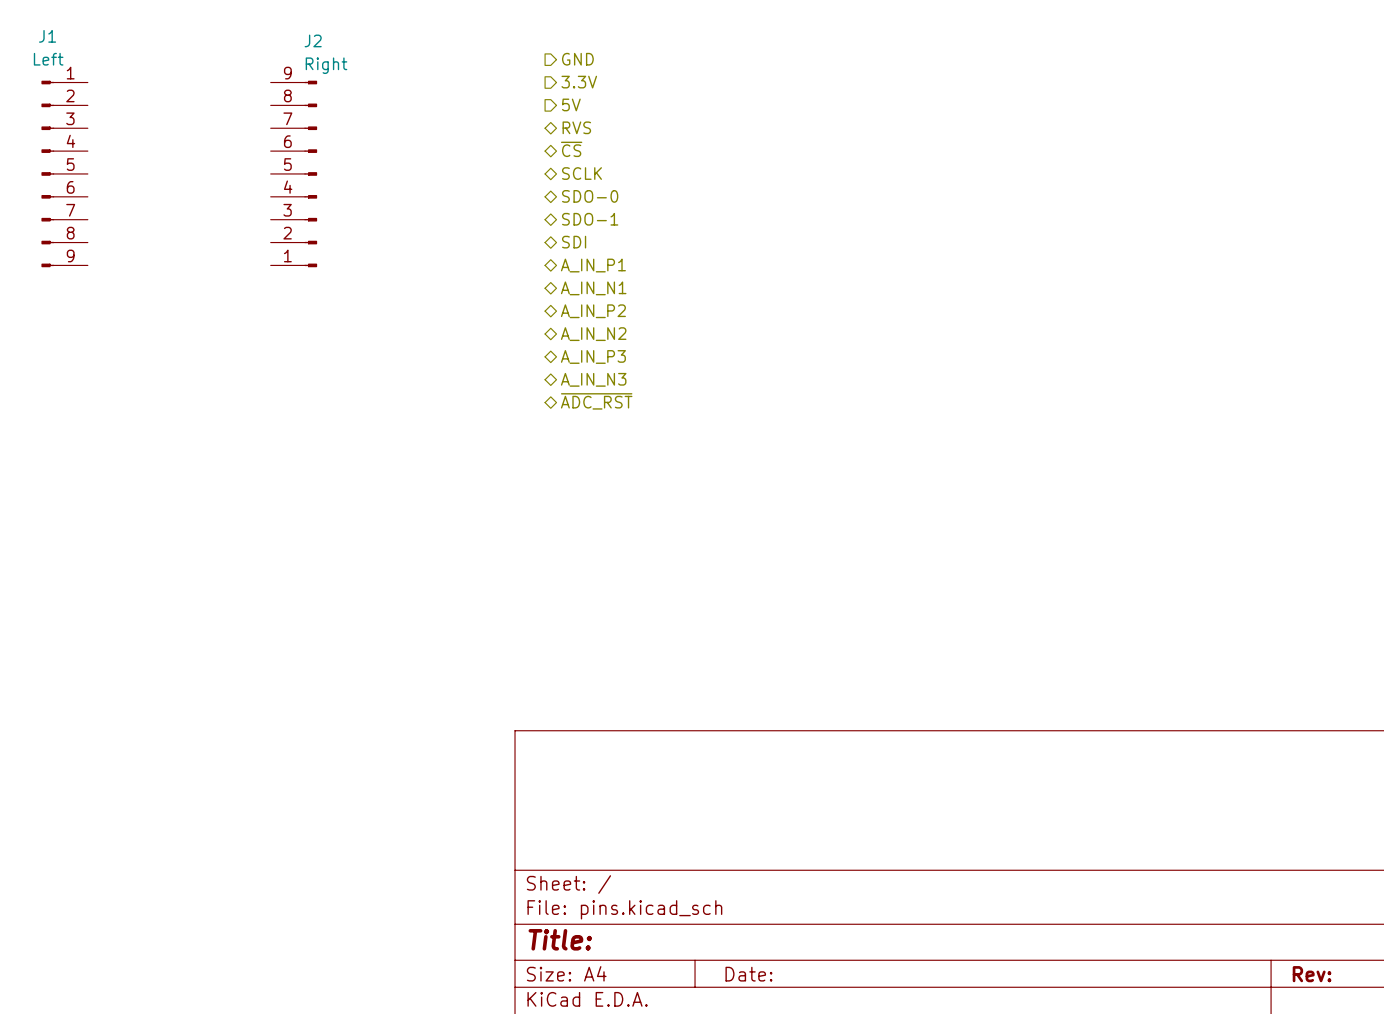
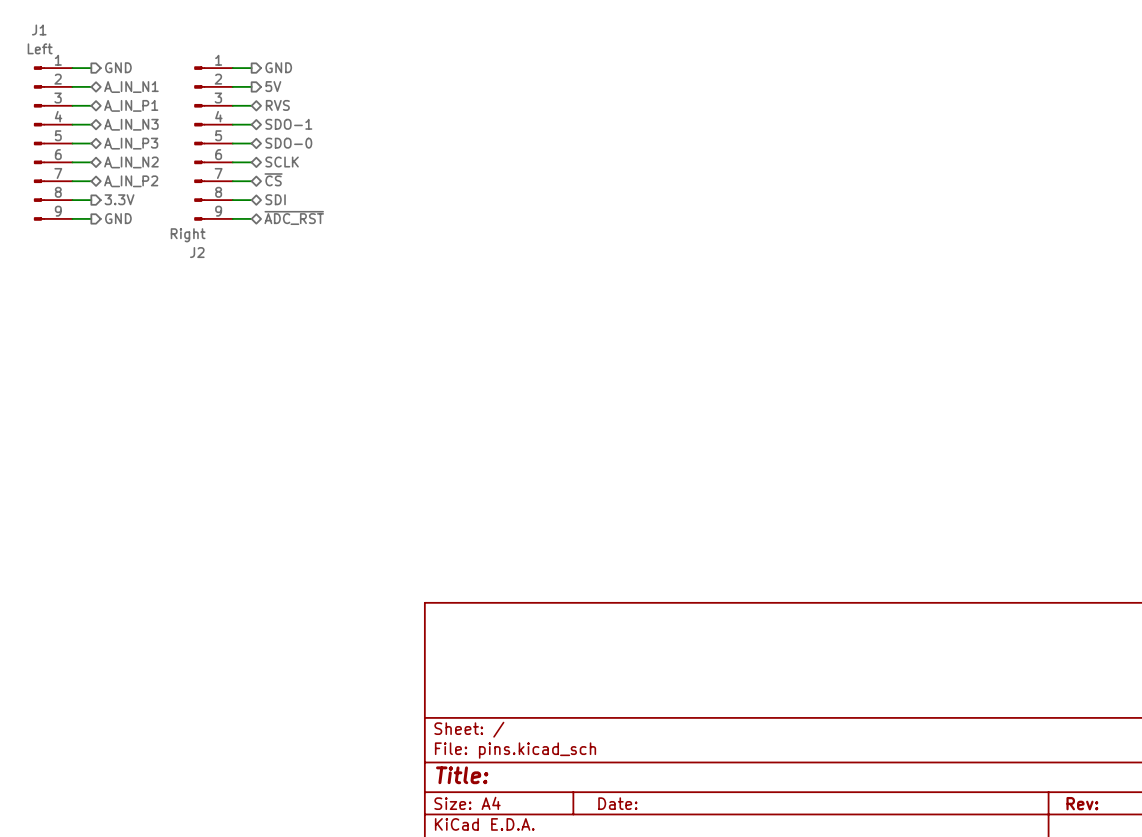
hierarchical label: GND (577, 59) -> none
wire: none -> (72, 68) (91, 68)
hierarchical label: none -> GND (118, 67)
hierarchical label: none -> GND (278, 67)
hierarchical label: 3.3V (579, 82) -> none
hierarchical label: none -> 5V (273, 86)
hierarchical label: 5V (571, 104) -> none
wire: none -> (72, 86) (91, 86)
hierarchical label: none -> A_IN_N1 (131, 87)
hierarchical label: none -> RVS (277, 105)
hierarchical label: RVS (576, 127) -> none
wire: none -> (72, 105) (91, 105)
hierarchical label: none -> A_IN_P1 (131, 105)
hierarchical label: ~{CS} (571, 149) -> none
hierarchical label: none -> SDO-1 (288, 124)
wire: none -> (72, 124) (91, 124)
hierarchical label: none -> A_IN_N3 (131, 124)
wire: none -> (72, 143) (91, 143)
J2 rotation: 0° (310, 173) -> 180° (199, 143)
hierarchical label: none -> SDO-0 (288, 143)
hierarchical label: SCLK (581, 173) -> none
hierarchical label: none -> A_IN_P3 (131, 143)
wire: none -> (72, 162) (91, 162)
hierarchical label: none -> A_IN_N2 (131, 162)
hierarchical label: none -> SCLK (282, 162)
hierarchical label: SDO-0 (590, 196) -> none
hierarchical label: none -> ~{CS} (273, 179)
wire: none -> (72, 181) (91, 181)
hierarchical label: none -> A_IN_P2 (131, 181)
hierarchical label: SDO-1 (590, 219) -> none
wire: none -> (72, 200) (91, 200)
hierarchical label: none -> 3.3V (119, 199)
hierarchical label: none -> SDI (275, 199)
hierarchical label: SDI (574, 242) -> none
hierarchical label: none -> GND (118, 218)
hierarchical label: none -> ~{ADC_RST} (294, 217)
wire: none -> (72, 218) (91, 218)
hierarchical label: A_IN_P1 (593, 265) -> none
hierarchical label: A_IN_N1 (593, 288) -> none
hierarchical label: A_IN_P2 (593, 311) -> none
hierarchical label: A_IN_N2 (593, 334) -> none
hierarchical label: A_IN_P3 (593, 356) -> none
hierarchical label: A_IN_N3 (593, 379) -> none
hierarchical label: ~{ADC_RST} (596, 401) -> none

